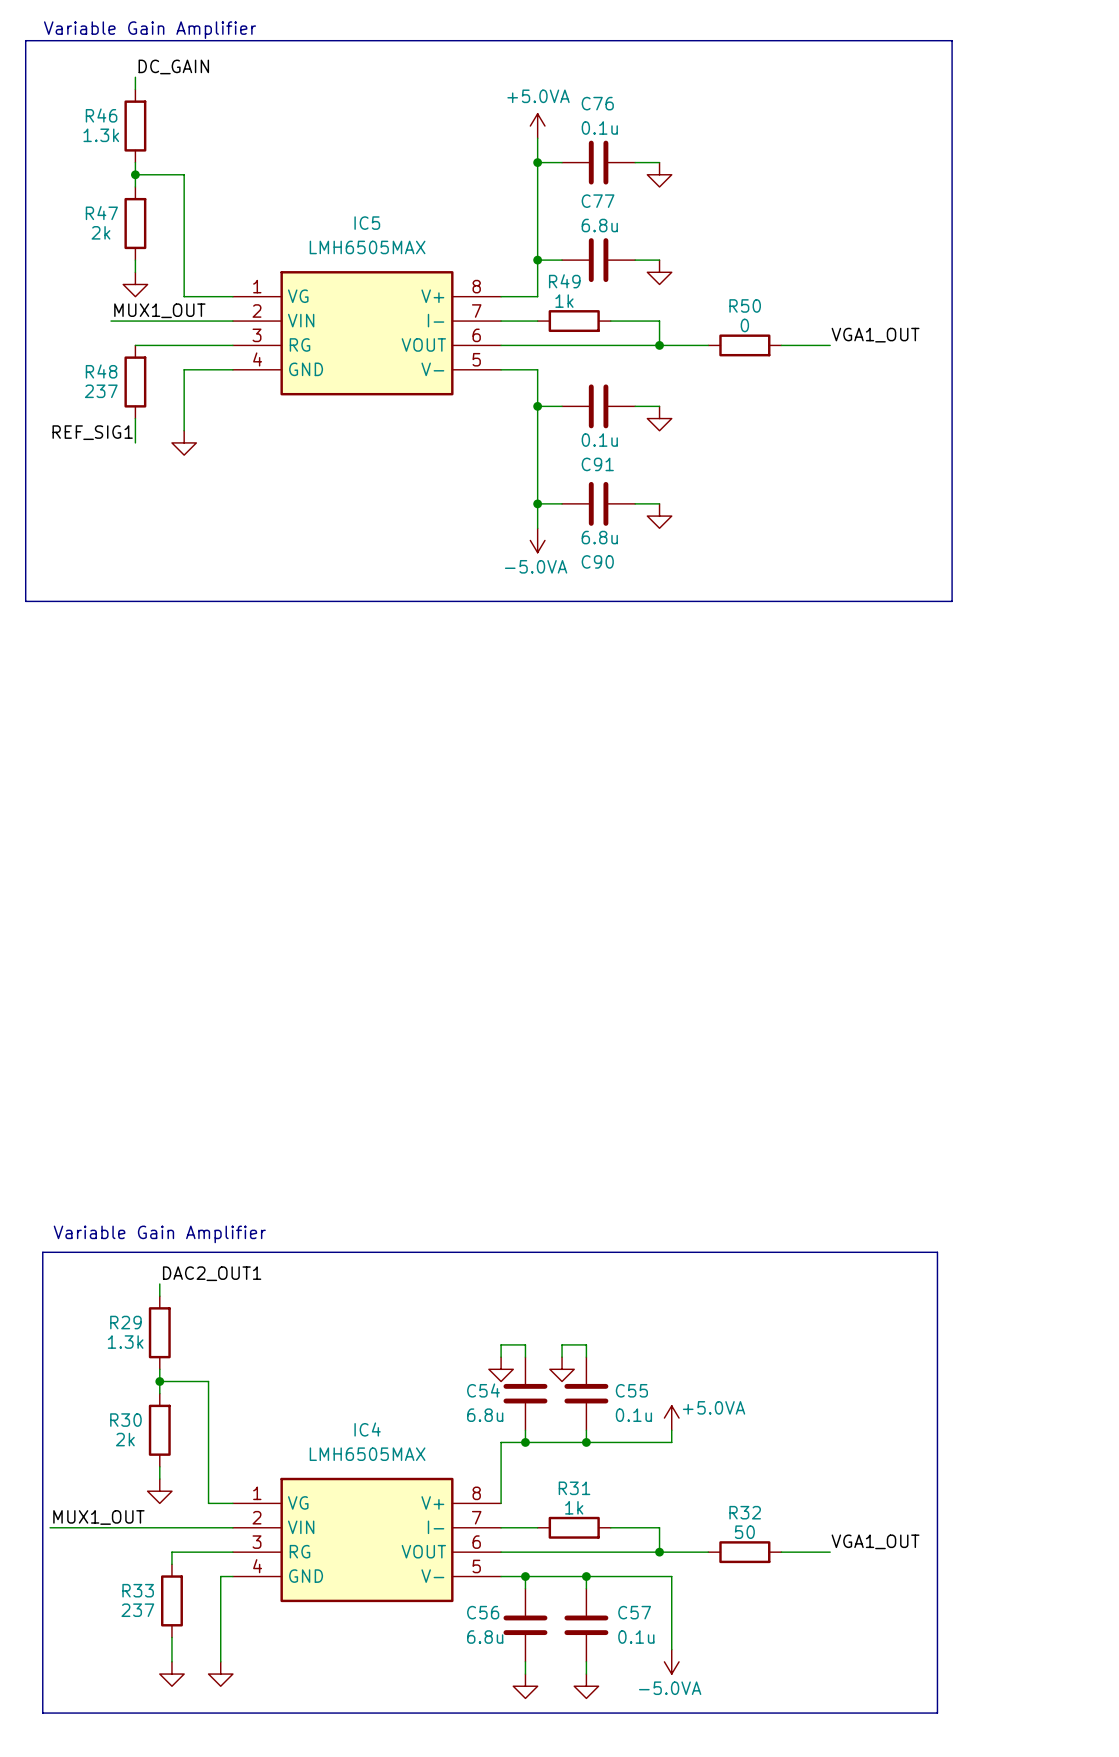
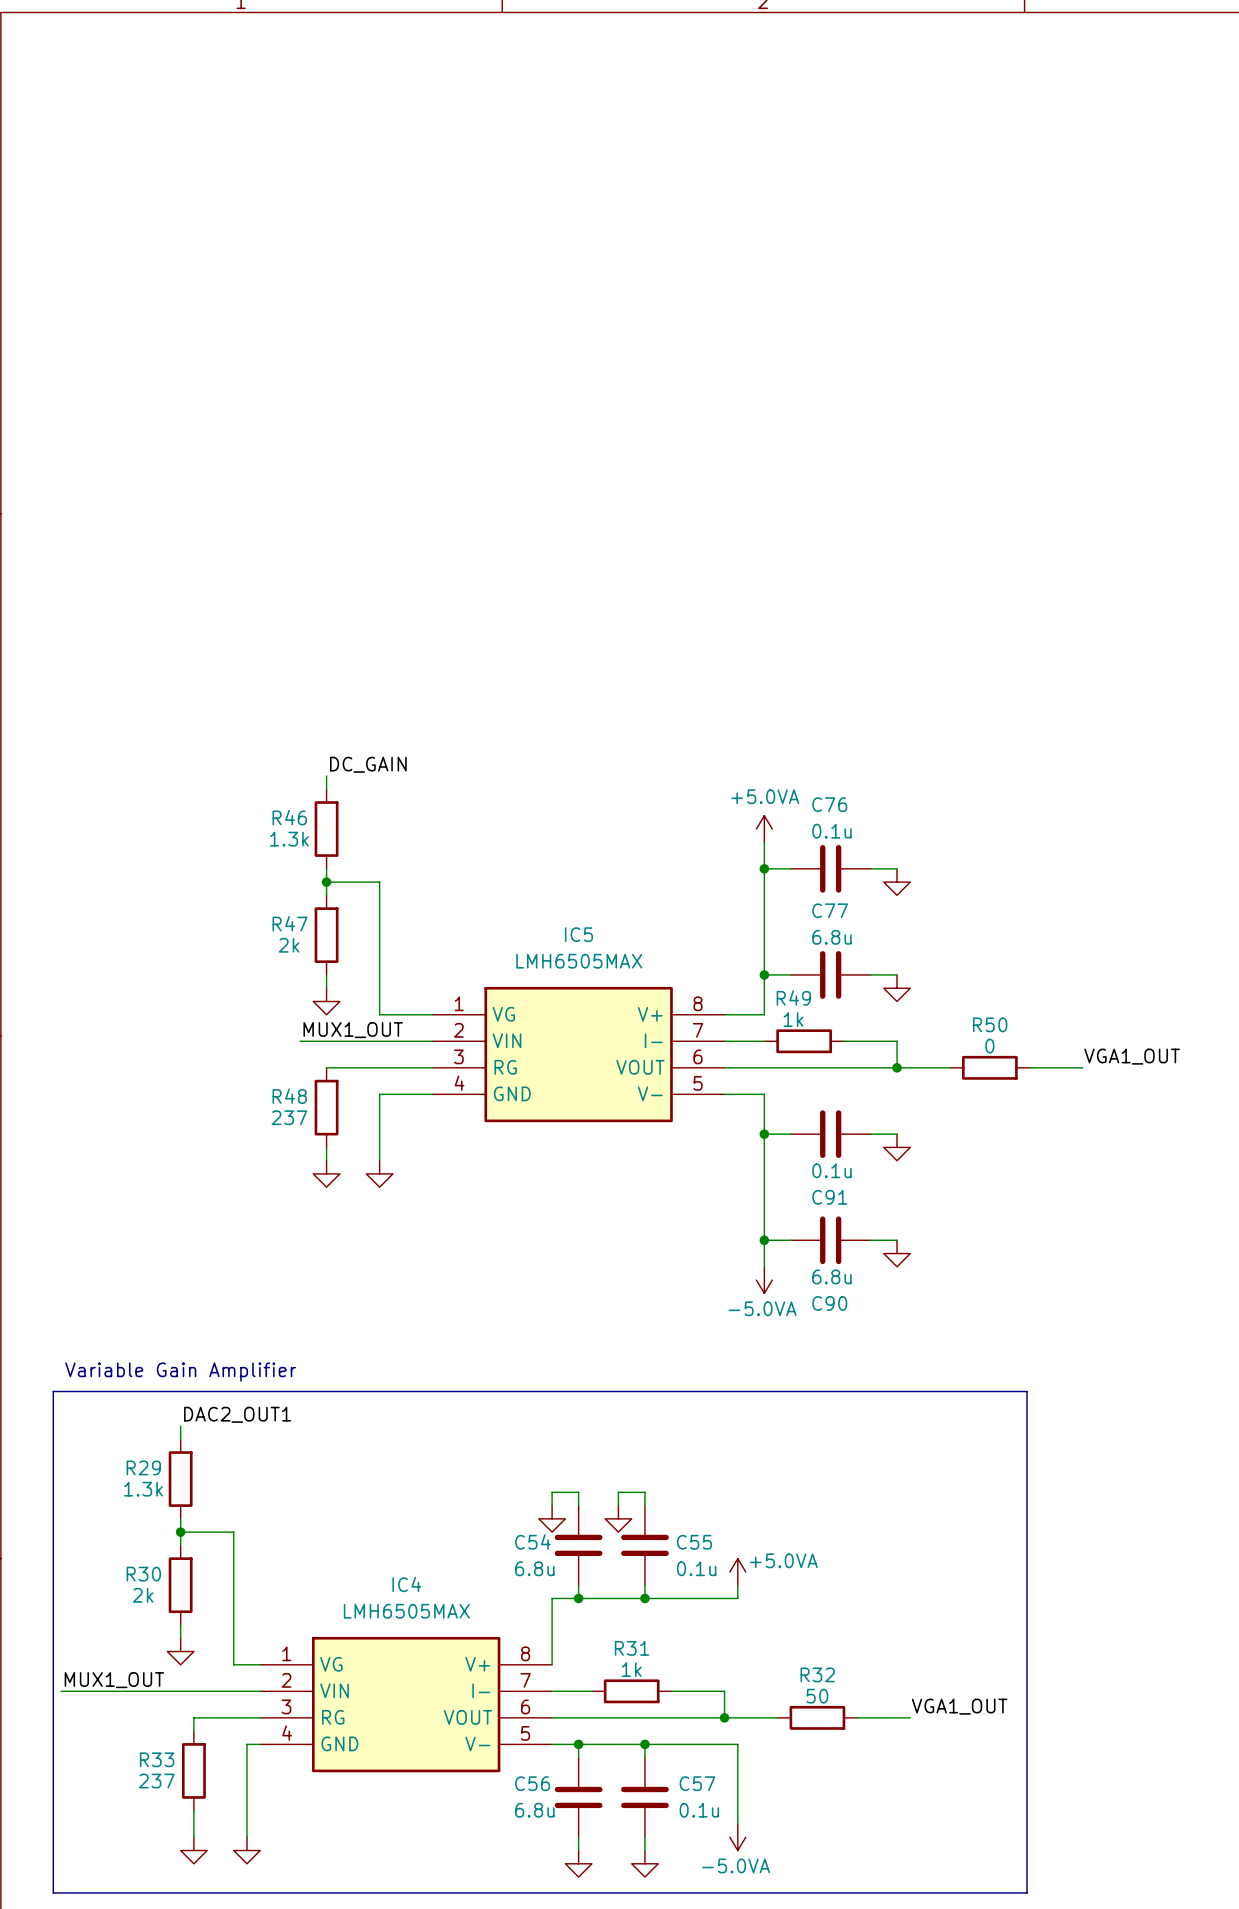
text: Variable Gain Amplifier (150, 30) -> none
line: (25, 40) (952, 40) (952, 601) (25, 601) (25, 40) -> none
label: DC_GAIN (173, 66) -> none
wire: (135, 77) (135, 89) -> none
R46 position: (135, 126) -> (326, 829)
power symbol: +5.0VA (537, 126) -> none
wire: (537, 138) (537, 296) (501, 296) -> none
wire: (135, 162) (135, 186) -> none
wire: (537, 162) (562, 162) -> none
junction: (537, 162) -> none
C76 position: (598, 162) -> (830, 868)
wire: (635, 162) (659, 162) -> none
wire: (135, 174) (184, 174) (184, 296) (232, 296) -> none
junction: (135, 174) -> none
power symbol: (659, 174) -> none
R47 position: (135, 223) -> (326, 935)
wire: (135, 260) (135, 272) -> none
wire: (537, 260) (562, 260) -> none
junction: (537, 260) -> none
C77 position: (598, 260) -> (830, 974)
wire: (635, 260) (659, 260) -> none
power symbol: (659, 272) -> none
power symbol: (135, 284) -> none
label: MUX1_OUT (159, 310) -> none
wire: (111, 321) (232, 321) -> none
wire: (501, 321) (537, 321) -> none
R49 position: (574, 321) -> (804, 1041)
wire: (610, 321) (659, 321) (659, 345) -> none
IC5 position: (367, 333) -> (578, 1054)
label: VGA1_OUT (875, 335) -> none
wire: (135, 345) (232, 345) -> none
wire: (501, 345) (708, 345) -> none
junction: (659, 345) -> none
R50 position: (744, 345) -> (989, 1067)
wire: (781, 345) (830, 345) -> none
wire: (232, 369) (184, 369) (184, 430) -> none
wire: (501, 369) (537, 369) (537, 528) -> none
R48 position: (135, 381) -> (326, 1107)
wire: (537, 406) (562, 406) -> none
junction: (537, 406) -> none
C91 position: (598, 406) -> (830, 1134)
wire: (635, 406) (659, 406) -> none
wire: (135, 418) (135, 442) -> none
power symbol: (659, 418) -> none
label: REF_SIG1 (92, 432) -> none
power symbol: (184, 442) -> none
wire: (537, 503) (562, 503) -> none
junction: (537, 503) -> none
C90 position: (598, 503) -> (830, 1240)
wire: (635, 503) (659, 503) -> none
power symbol: (659, 516) -> none
power symbol: -5.0VA (537, 540) -> none
label: none -> DC_GAIN (368, 764)
wire: none -> (326, 775) (326, 789)
power symbol: none -> +5.0VA (764, 829)
wire: none -> (764, 842) (764, 1014) (724, 1014)
wire: none -> (326, 868) (326, 895)
wire: none -> (764, 868) (790, 868)
junction: none -> (764, 868)
wire: none -> (870, 868) (897, 868)
wire: none -> (326, 882) (379, 882) (379, 1014) (432, 1014)
junction: none -> (326, 882)
power symbol: none -> (897, 882)
wire: none -> (326, 974) (326, 988)
wire: none -> (764, 974) (790, 974)
junction: none -> (764, 974)
wire: none -> (870, 974) (897, 974)
power symbol: none -> (897, 988)
power symbol: none -> (326, 1001)
label: none -> MUX1_OUT (353, 1030)
wire: none -> (300, 1041) (432, 1041)
wire: none -> (724, 1041) (764, 1041)
wire: none -> (843, 1041) (897, 1041) (897, 1067)
label: none -> VGA1_OUT (1132, 1056)
wire: none -> (326, 1067) (432, 1067)
wire: none -> (724, 1067) (950, 1067)
junction: none -> (897, 1067)
wire: none -> (1029, 1067) (1082, 1067)
wire: none -> (432, 1094) (379, 1094) (379, 1160)
wire: none -> (724, 1094) (764, 1094) (764, 1266)
wire: none -> (764, 1134) (790, 1134)
junction: none -> (764, 1134)
wire: none -> (870, 1134) (897, 1134)
wire: none -> (326, 1147) (326, 1160)
power symbol: none -> (897, 1147)
power symbol: none -> (326, 1173)
power symbol: none -> (379, 1173)
wire: none -> (764, 1240) (790, 1240)
junction: none -> (764, 1240)
wire: none -> (870, 1240) (897, 1240)
power symbol: none -> (897, 1253)
power symbol: none -> -5.0VA (764, 1280)

